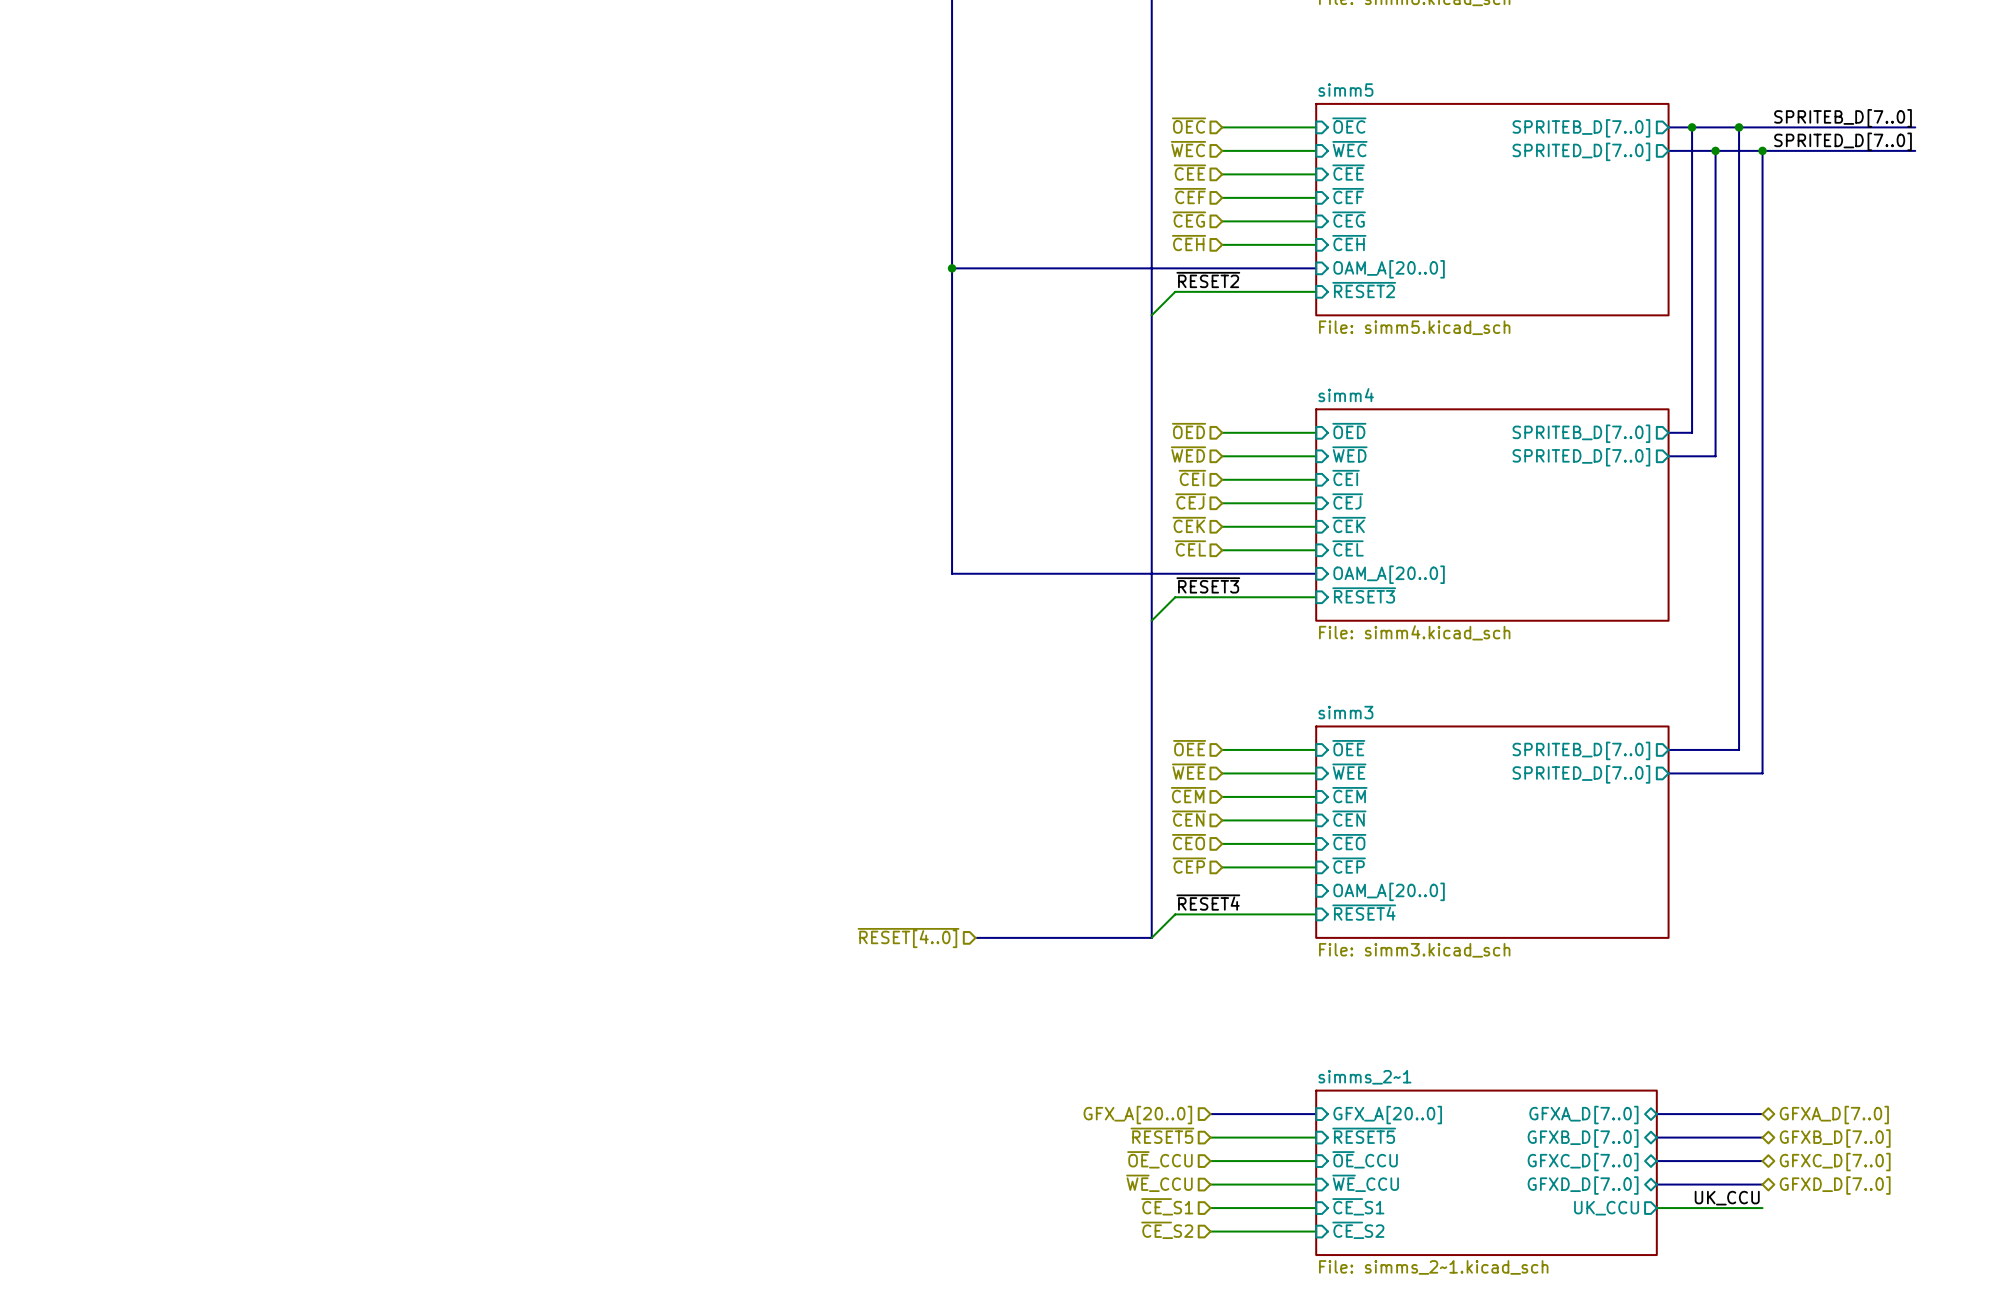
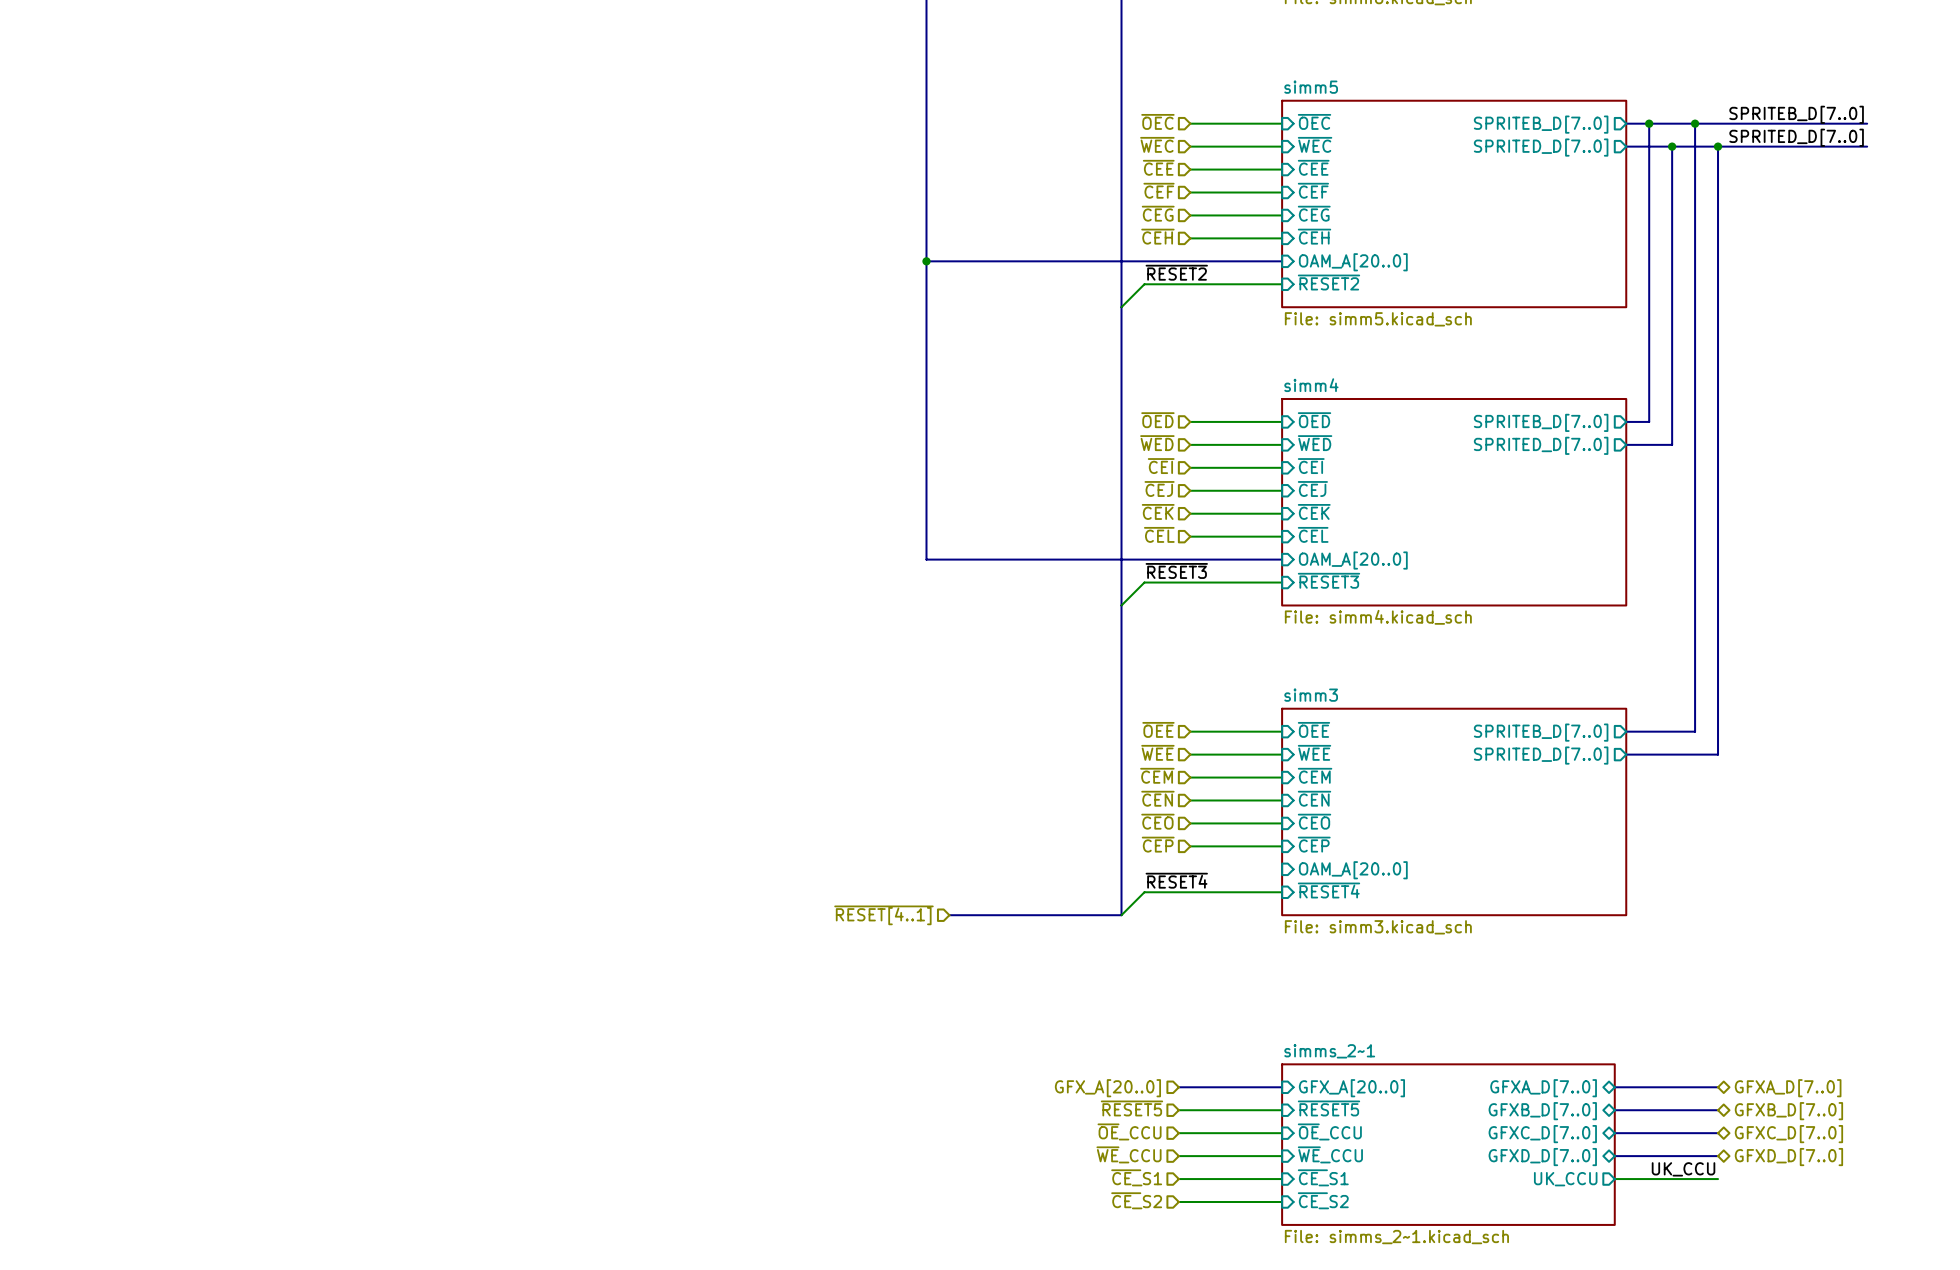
hierarchical label: ~{RESET[4..0]} (908, 938) -> ~{RESET[4..1]} (883, 915)

